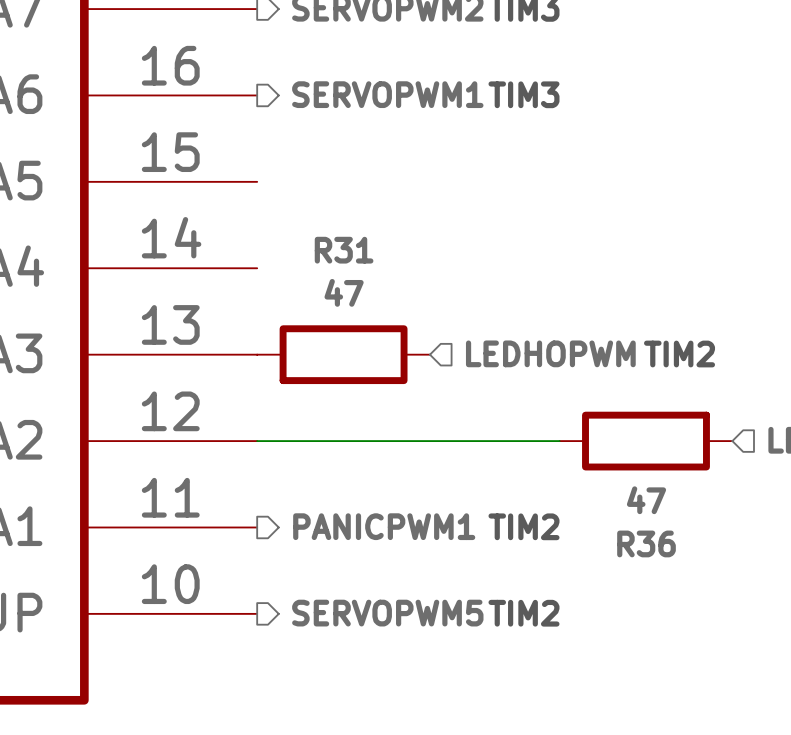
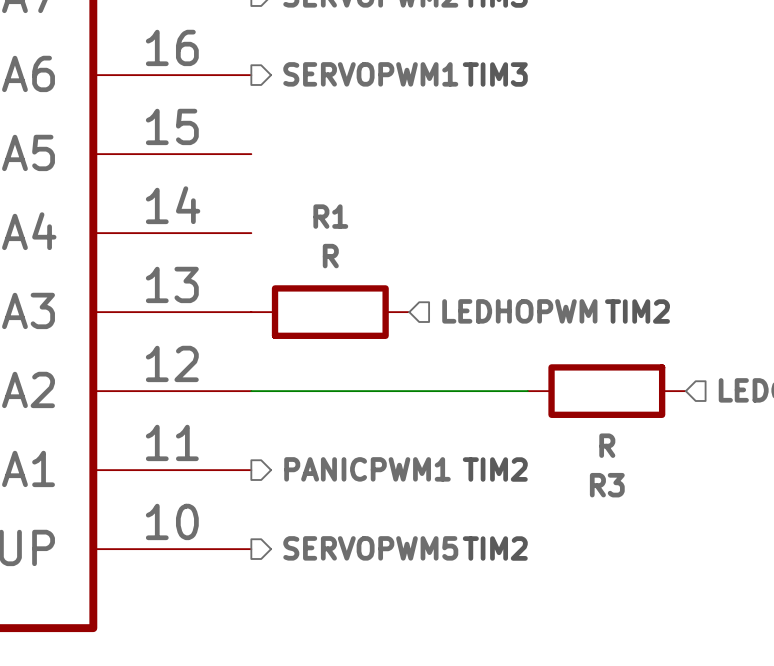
R31 name: R31 (344, 250) -> R1 (330, 216)
R31 value: 47 (344, 292) -> R (330, 256)
R36 value: 47 (646, 500) -> R (607, 445)
R36 name: R36 (646, 543) -> R3 (607, 485)

